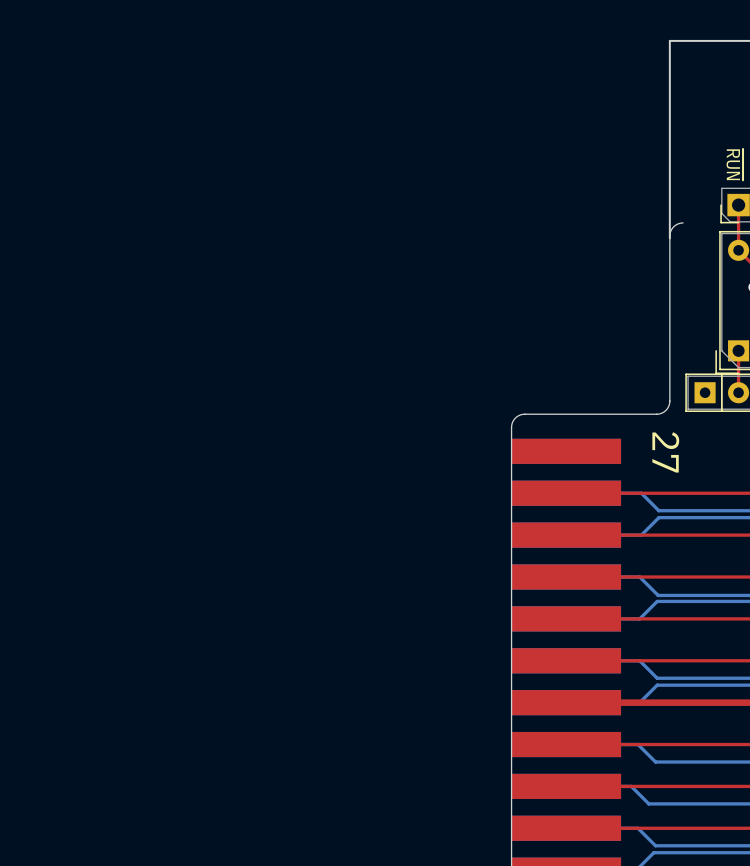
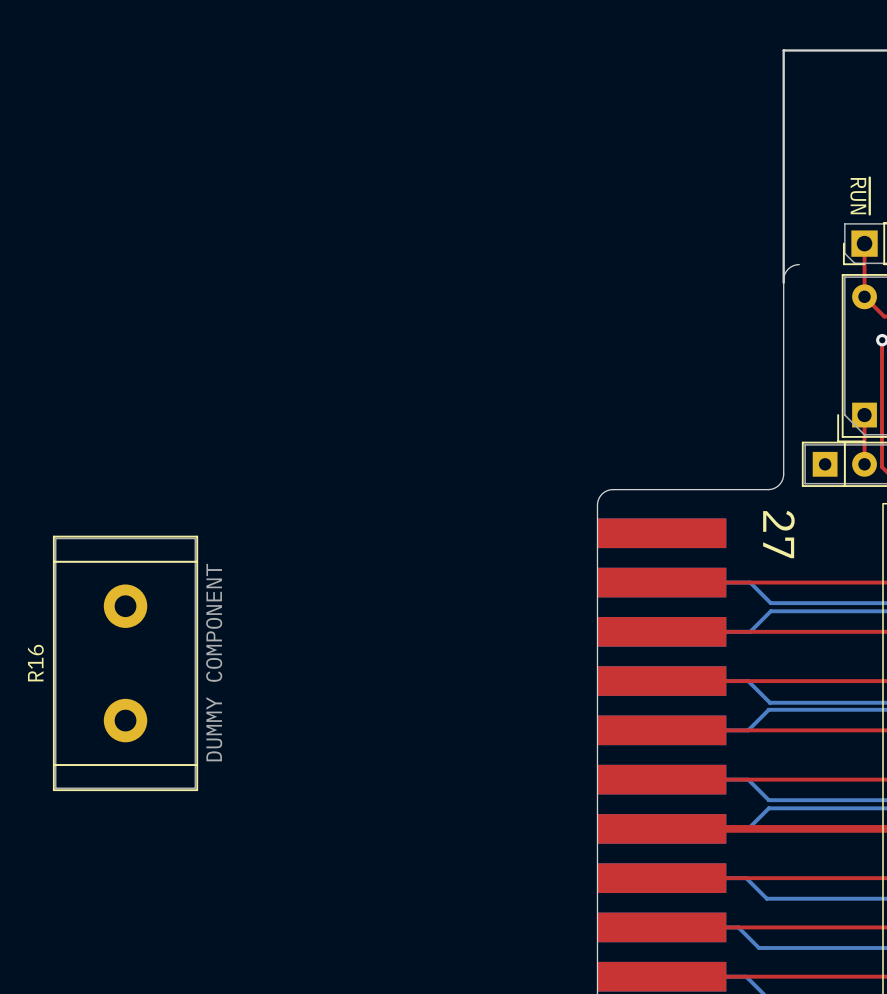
R16: none -> DUMMY COMPONENT (125, 663)

